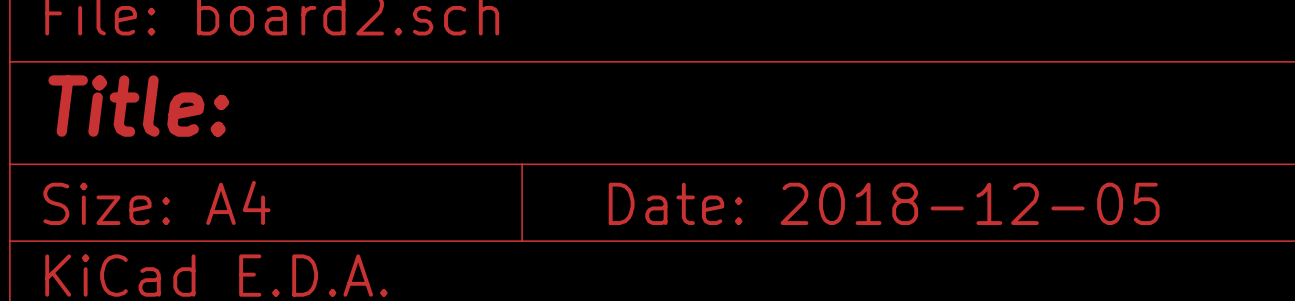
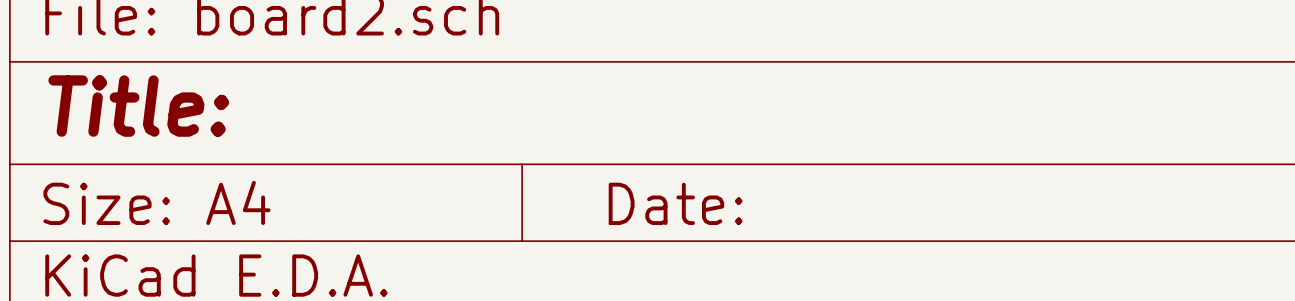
title block: Date: 2018-12-05 (884, 203) -> Date: (675, 203)

